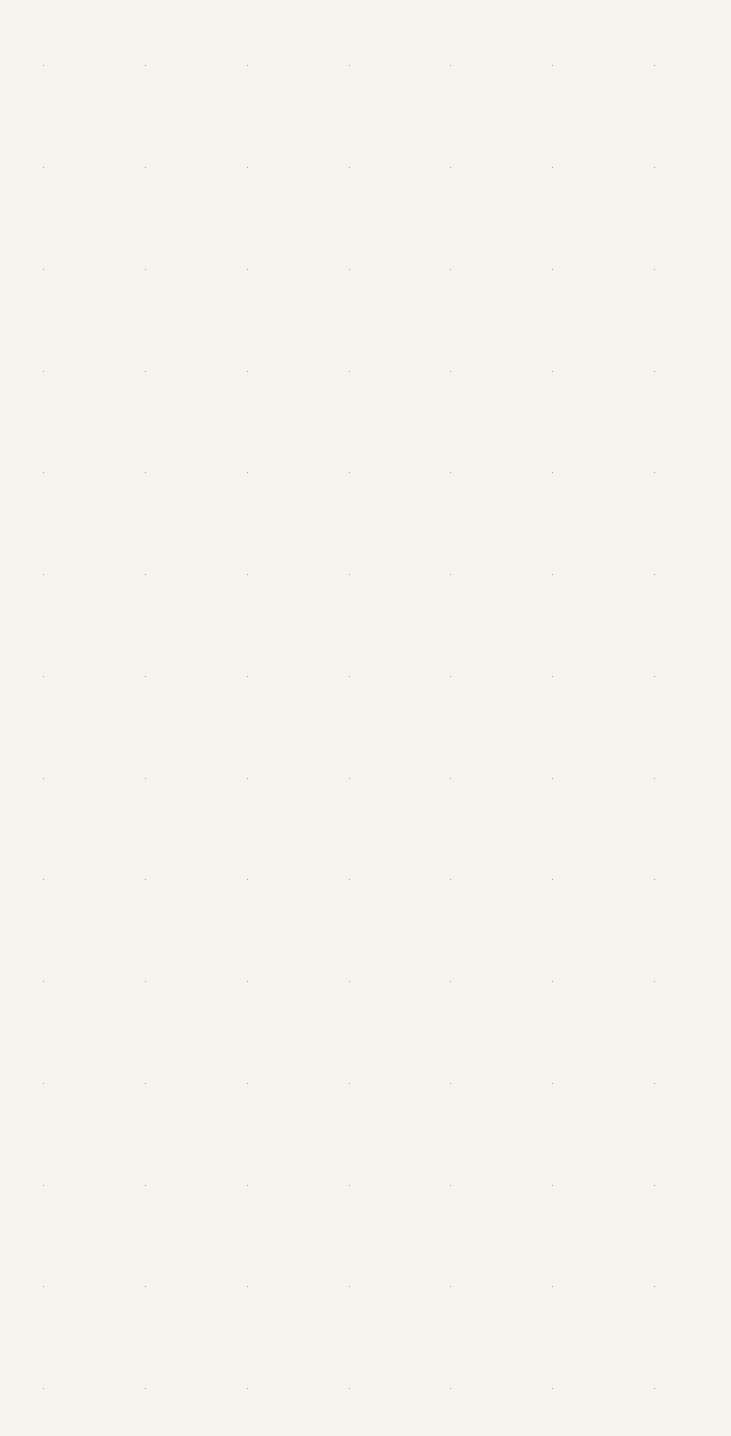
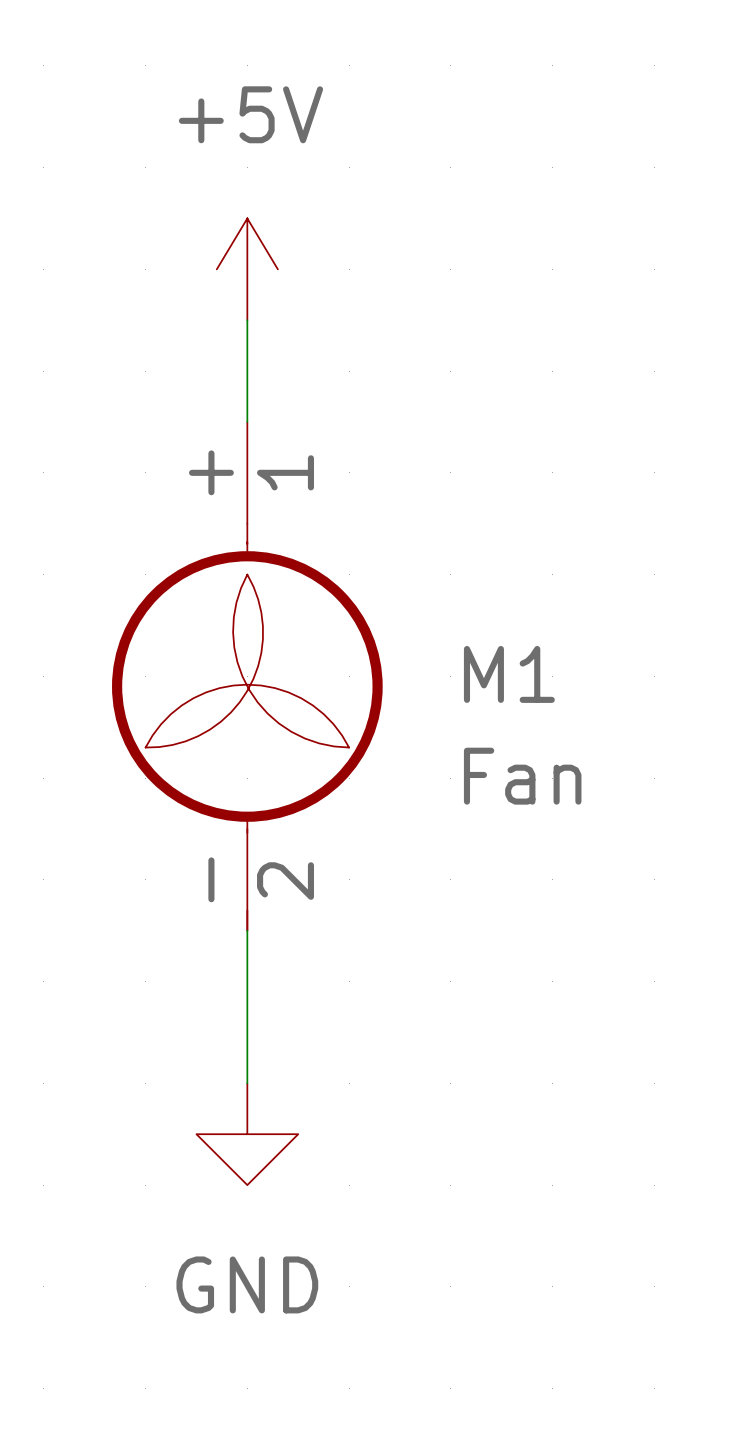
power symbol: none -> +5V (247, 269)
wire: none -> (247, 320) (247, 421)
M1: none -> Fan (247, 676)
wire: none -> (247, 930) (247, 1083)
power symbol: none -> GND (247, 1134)

